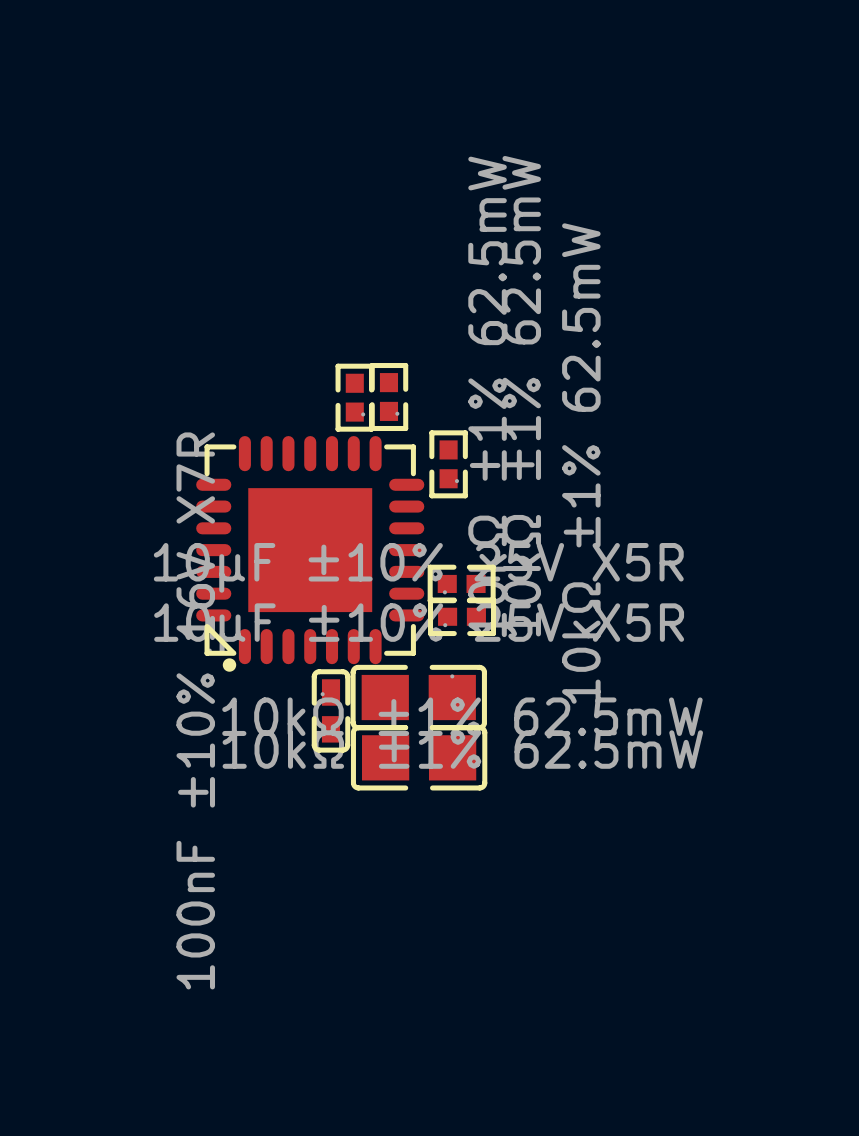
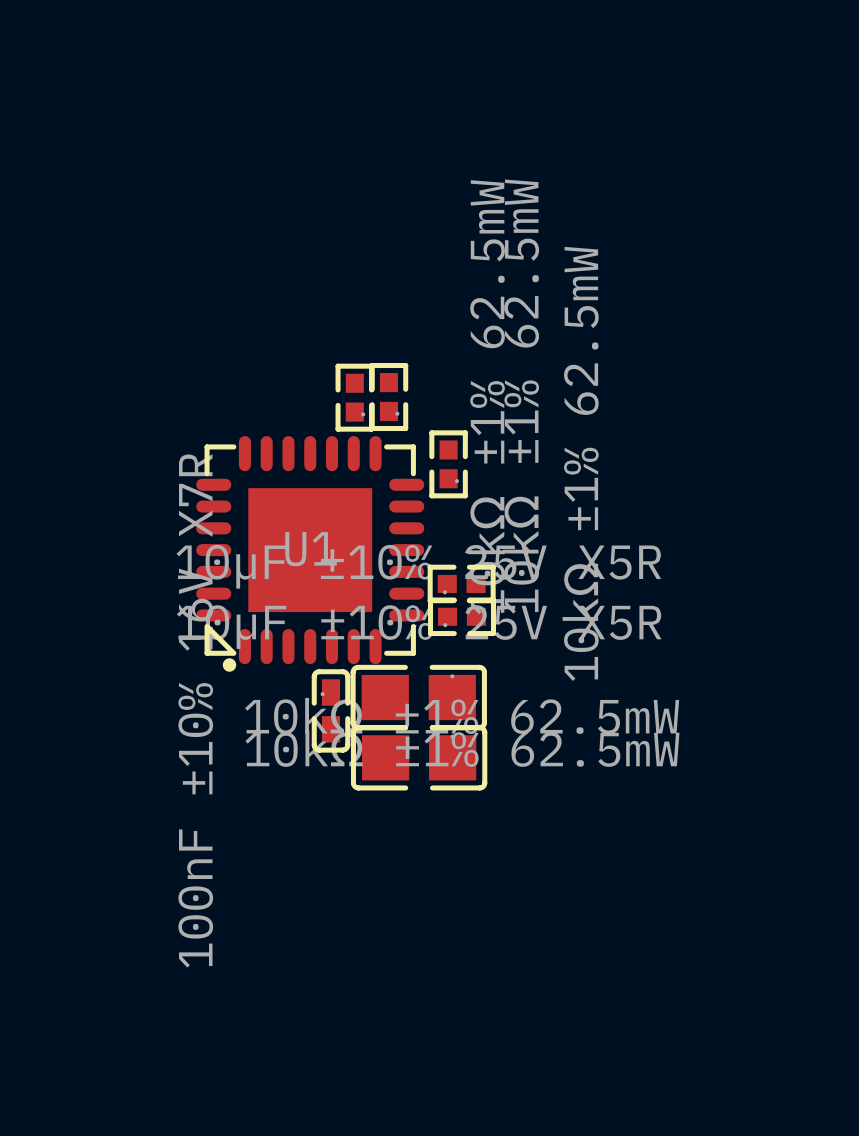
U1 name: none -> U1 (311, 549)

